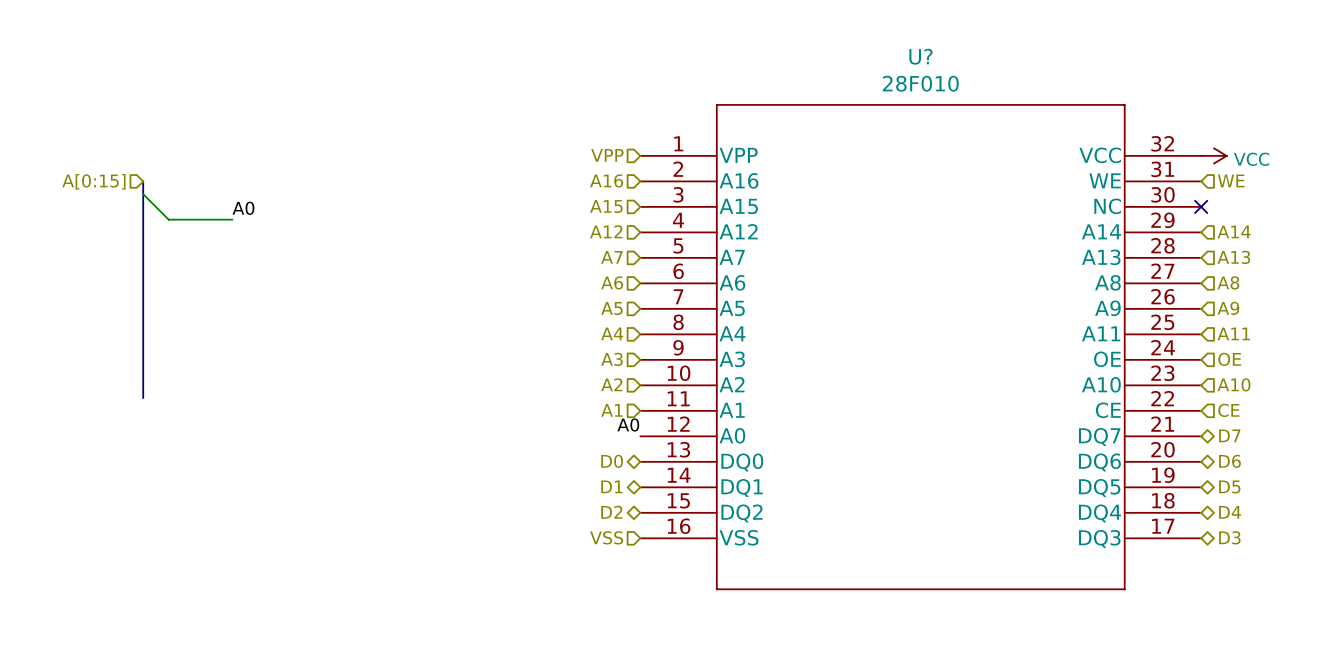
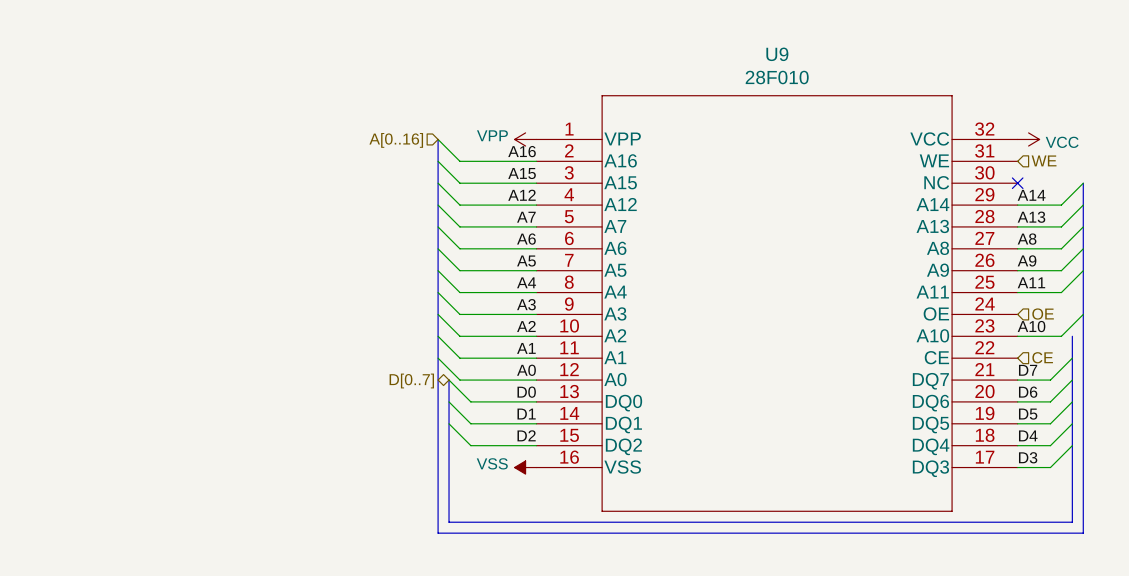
U? name: U? (920, 56) -> U9 (777, 54)
wire: none -> (438, 139) (459, 161) (536, 161)
bus: none -> (438, 139) (438, 533) (1083, 533) (1083, 183)
hierarchical label: VPP (607, 155) -> none
power symbol: none -> VPP (525, 139)
hierarchical label: none -> A[0..16] (396, 140)
label: none -> A16 (522, 151)
hierarchical label: A16 (606, 180) -> none
hierarchical label: A[0:15] (93, 181) -> none
bus: (143, 181) (143, 398) -> none
wire: none -> (438, 161) (459, 183) (536, 183)
wire: (143, 194) (168, 219) (232, 219) -> none
label: none -> A15 (522, 173)
wire: none -> (438, 183) (459, 205) (536, 205)
hierarchical label: A15 (606, 206) -> none
wire: none -> (1083, 183) (1061, 205) (1017, 205)
label: A0 (243, 208) -> none
label: none -> A12 (521, 195)
label: none -> A14 (1031, 195)
hierarchical label: A12 (606, 231) -> none
hierarchical label: A14 (1234, 231) -> none
wire: none -> (438, 205) (459, 226) (536, 226)
wire: none -> (1083, 205) (1061, 226) (1017, 226)
label: none -> A7 (526, 217)
label: none -> A13 (1031, 217)
wire: none -> (438, 226) (459, 248) (536, 248)
hierarchical label: A7 (611, 257) -> none
hierarchical label: A13 (1233, 257) -> none
wire: none -> (1083, 226) (1061, 248) (1017, 248)
label: none -> A6 (526, 239)
label: none -> A8 (1027, 239)
hierarchical label: A6 (612, 282) -> none
hierarchical label: A8 (1228, 282) -> none
wire: none -> (438, 248) (459, 270) (536, 270)
wire: none -> (1083, 248) (1061, 270) (1017, 270)
label: none -> A5 (526, 261)
label: none -> A9 (1027, 260)
wire: none -> (438, 270) (459, 292) (536, 292)
hierarchical label: A5 (611, 308) -> none
hierarchical label: A9 (1228, 308) -> none
wire: none -> (1083, 270) (1061, 292) (1017, 292)
label: none -> A4 (526, 282)
label: none -> A11 (1031, 282)
hierarchical label: A4 (612, 333) -> none
hierarchical label: A11 (1233, 333) -> none
wire: none -> (438, 292) (459, 314) (536, 314)
label: none -> A3 (526, 304)
wire: none -> (438, 314) (459, 336) (536, 336)
hierarchical label: A3 (611, 359) -> none
wire: none -> (1083, 314) (1061, 336) (1017, 336)
label: none -> A2 (526, 326)
label: none -> A10 (1031, 326)
hierarchical label: A2 (611, 384) -> none
hierarchical label: A10 (1233, 384) -> none
wire: none -> (438, 336) (459, 358) (536, 358)
bus: none -> (1072, 336) (1072, 522) (449, 522) (449, 380)
label: none -> A1 (526, 348)
wire: none -> (438, 358) (459, 380) (536, 380)
hierarchical label: A1 (611, 410) -> none
wire: none -> (1072, 358) (1050, 380) (1017, 380)
label: none -> D7 (1028, 370)
hierarchical label: D7 (1229, 435) -> none
hierarchical label: none -> D[0..7] (411, 381)
wire: none -> (449, 380) (470, 401) (536, 401)
wire: none -> (1072, 380) (1050, 401) (1017, 401)
label: none -> D0 (526, 392)
label: none -> D6 (1028, 392)
wire: none -> (449, 401) (470, 423) (536, 423)
hierarchical label: D0 (612, 461) -> none
hierarchical label: D6 (1229, 461) -> none
wire: none -> (1072, 401) (1050, 423) (1017, 423)
label: none -> D1 (526, 414)
label: none -> D5 (1028, 414)
hierarchical label: D1 (611, 486) -> none
hierarchical label: D5 (1229, 486) -> none
wire: none -> (449, 423) (470, 445) (536, 445)
wire: none -> (1072, 423) (1050, 445) (1017, 445)
label: none -> D2 (526, 435)
label: none -> D4 (1028, 435)
hierarchical label: D2 (611, 512) -> none
hierarchical label: D4 (1230, 512) -> none
wire: none -> (1072, 445) (1050, 467) (1017, 467)
label: none -> D3 (1028, 457)
hierarchical label: VSS (606, 537) -> none
hierarchical label: D3 (1229, 537) -> none
power symbol: none -> VSS (525, 467)

